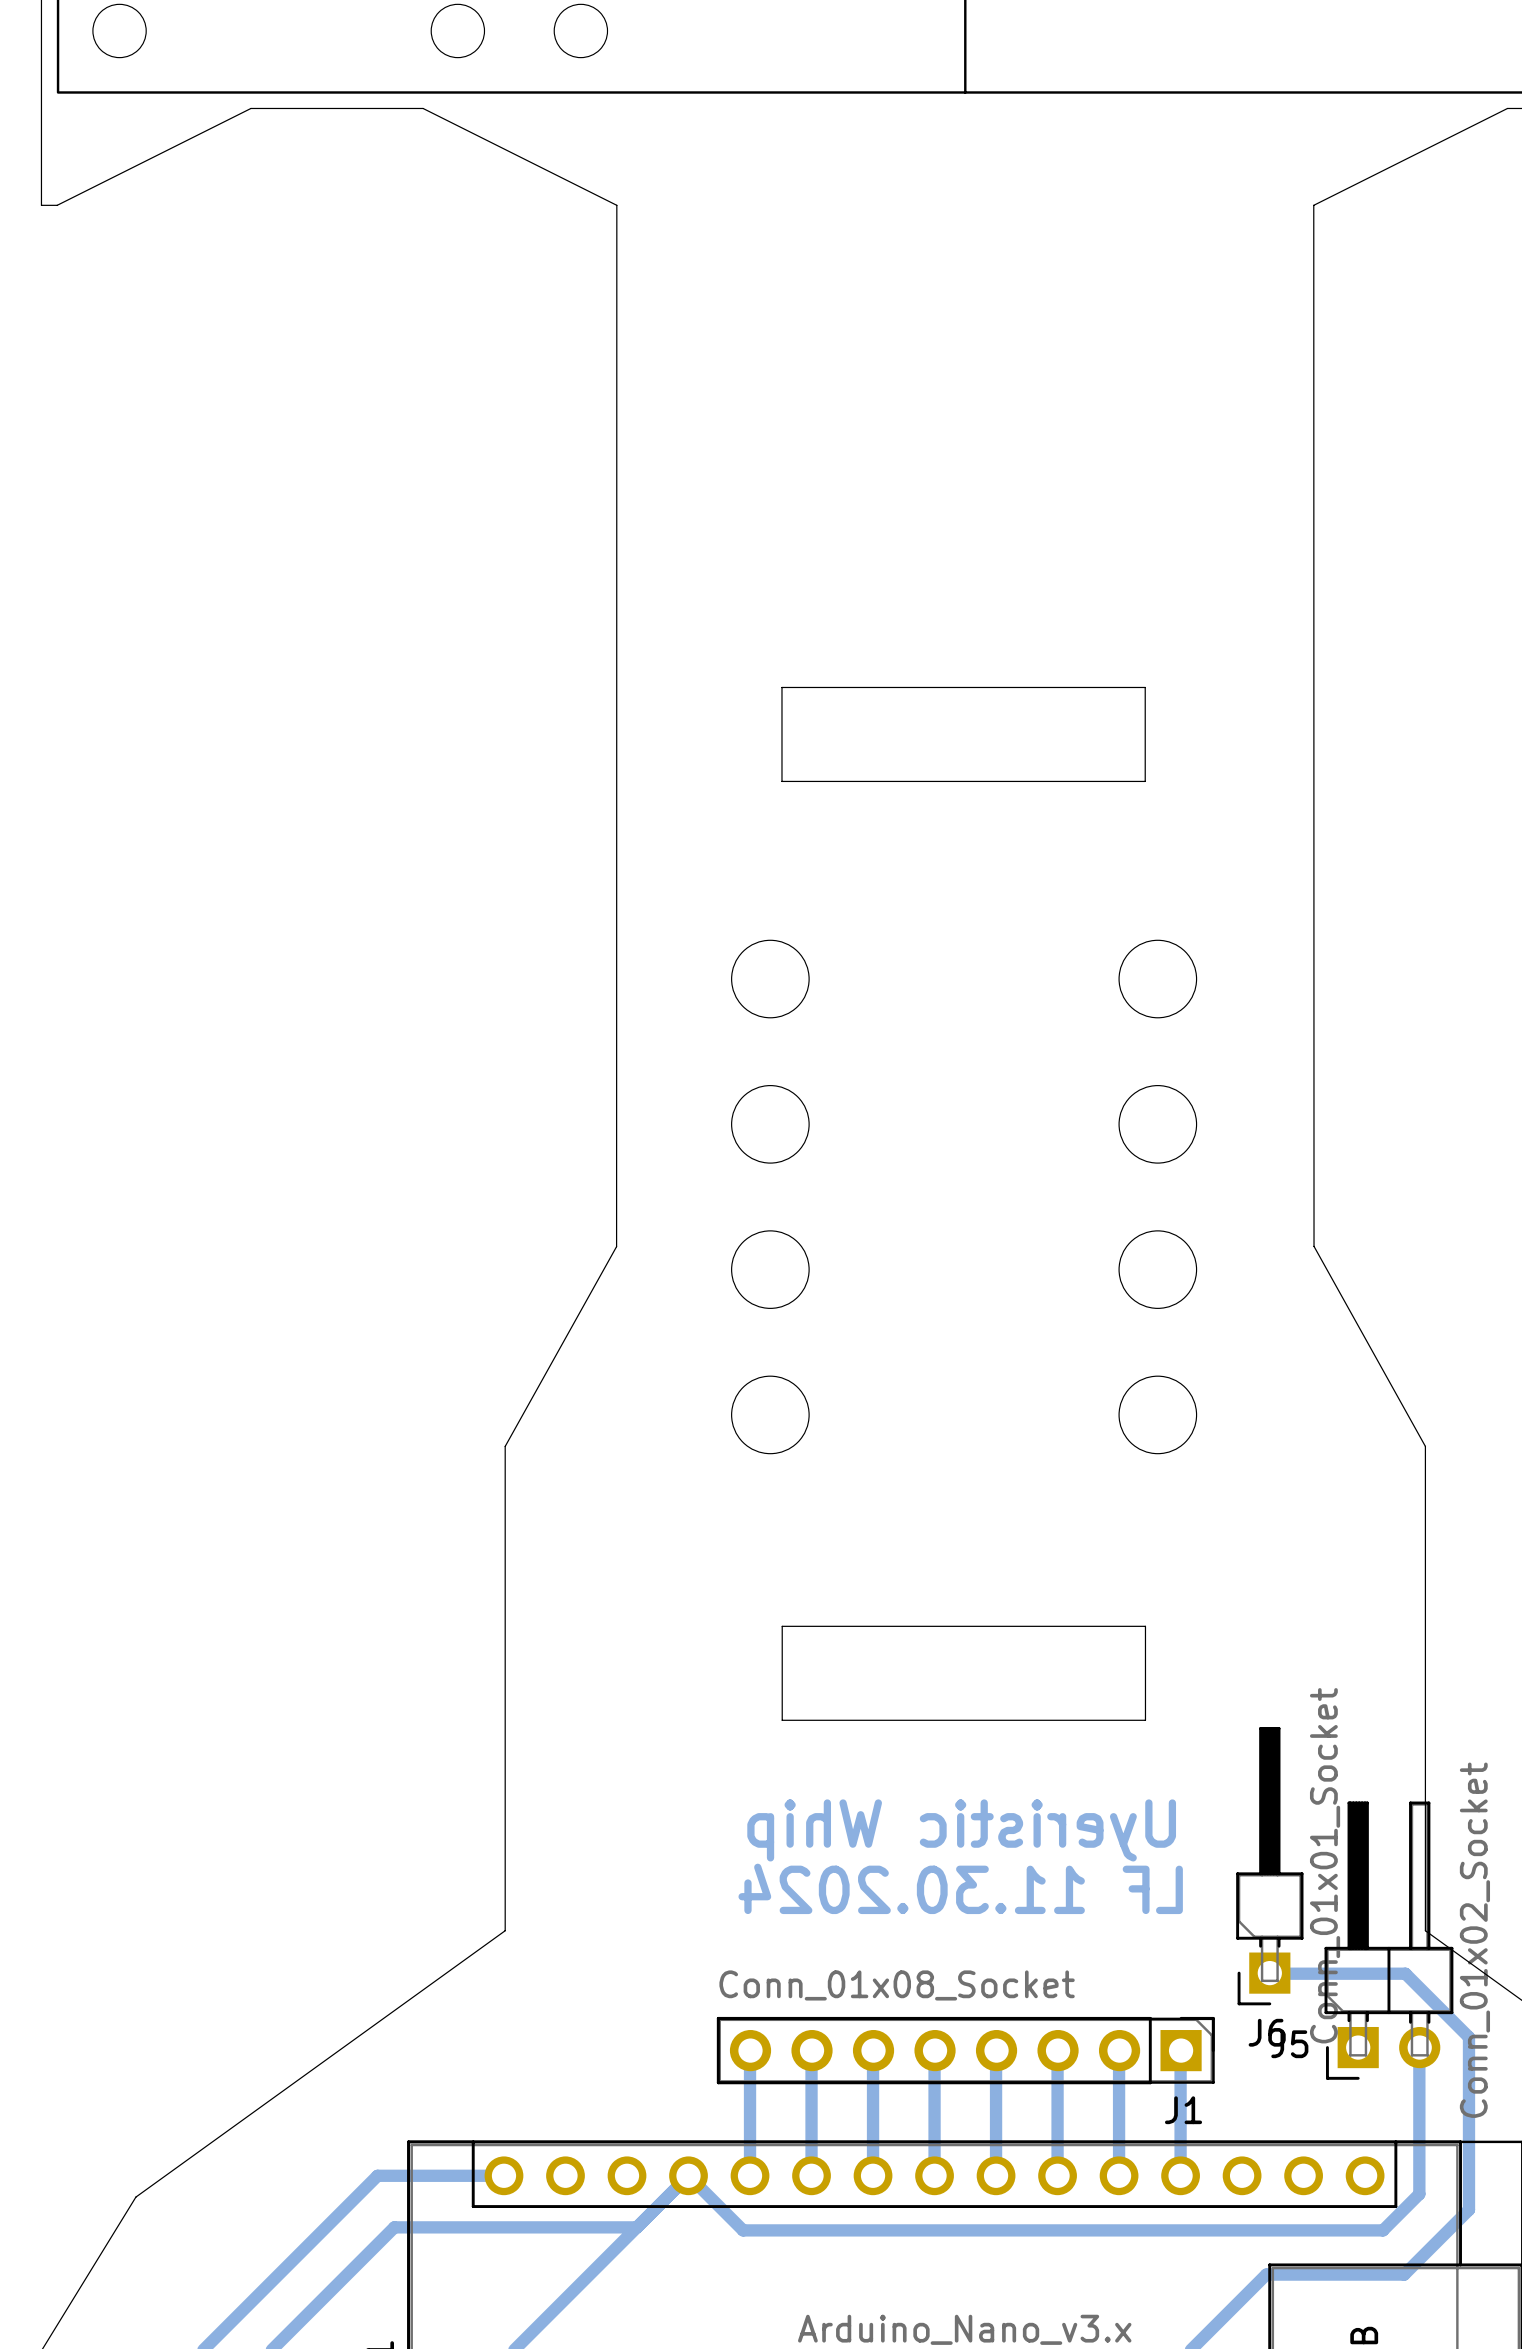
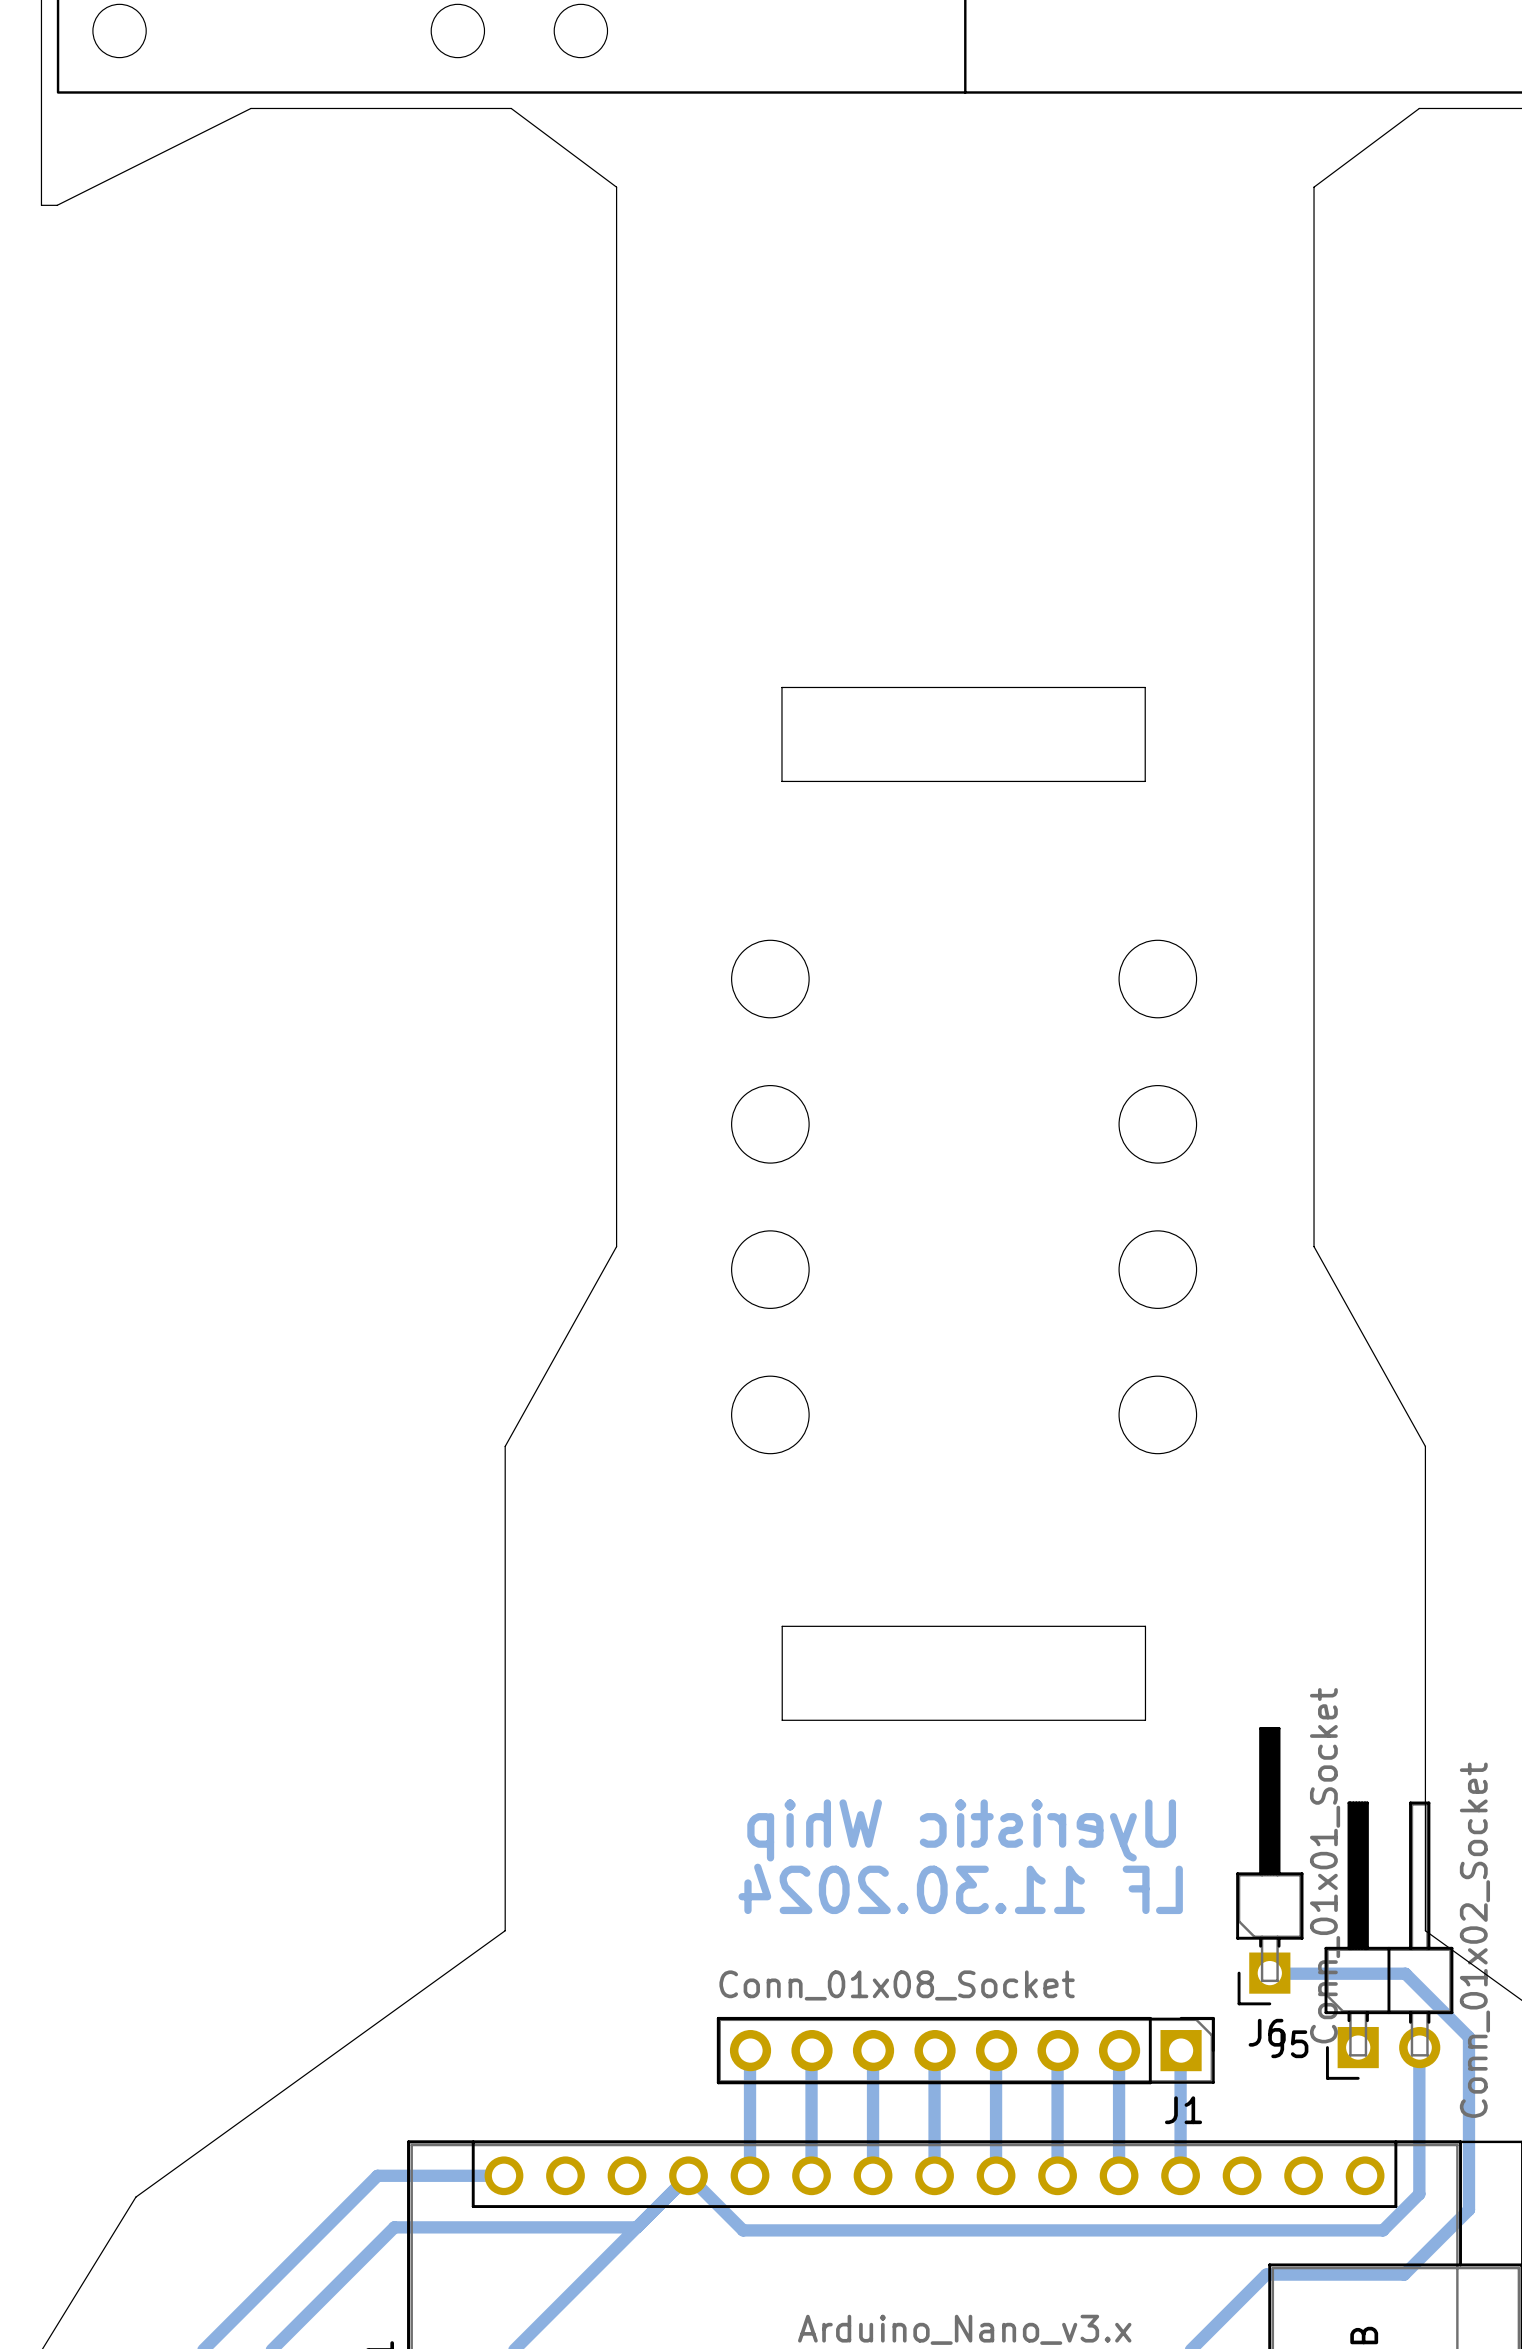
board edge: (423, 108) (616, 205) (616, 1246) -> (423, 108) (511, 108) (616, 187) (616, 1246)
board edge: (1507, 108) (1313, 205) (1314, 1246) (1425, 1446) -> (1507, 108) (1419, 108) (1314, 187) (1314, 1246) (1425, 1446)

